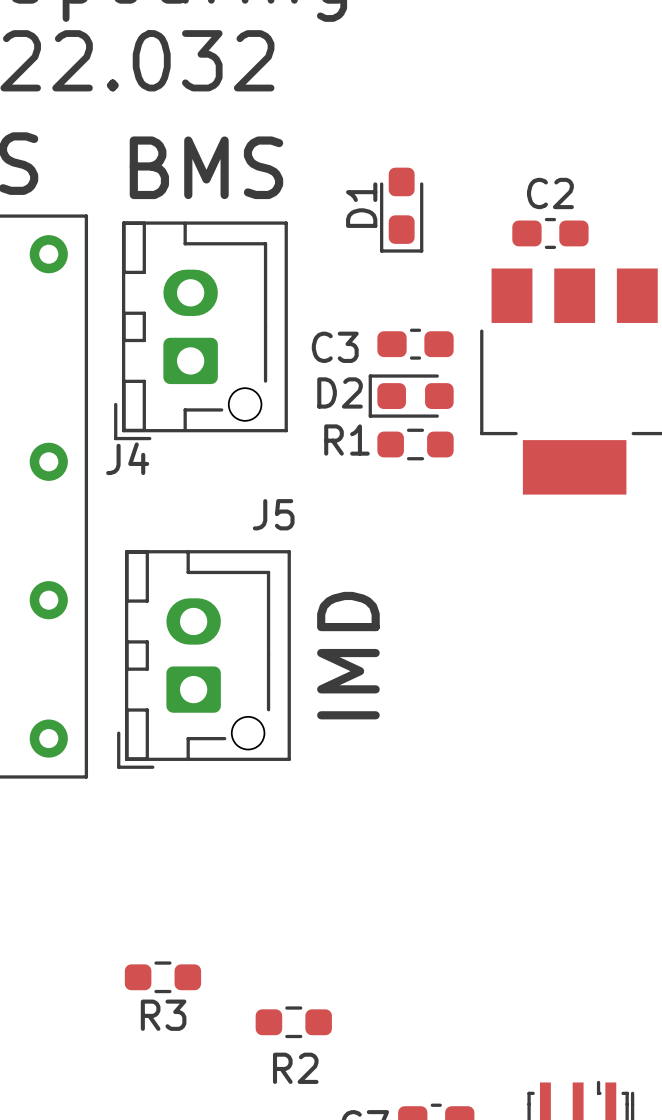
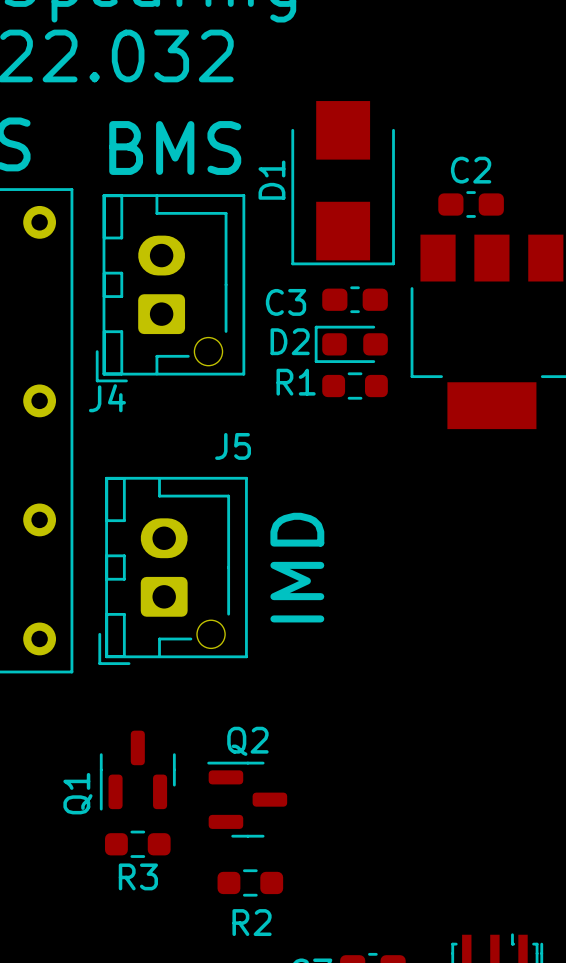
D1 footprint: [380, 167, 424, 253] -> [291, 101, 395, 266]
Q1: none -> (137, 770)
Q2: none -> (247, 799)

